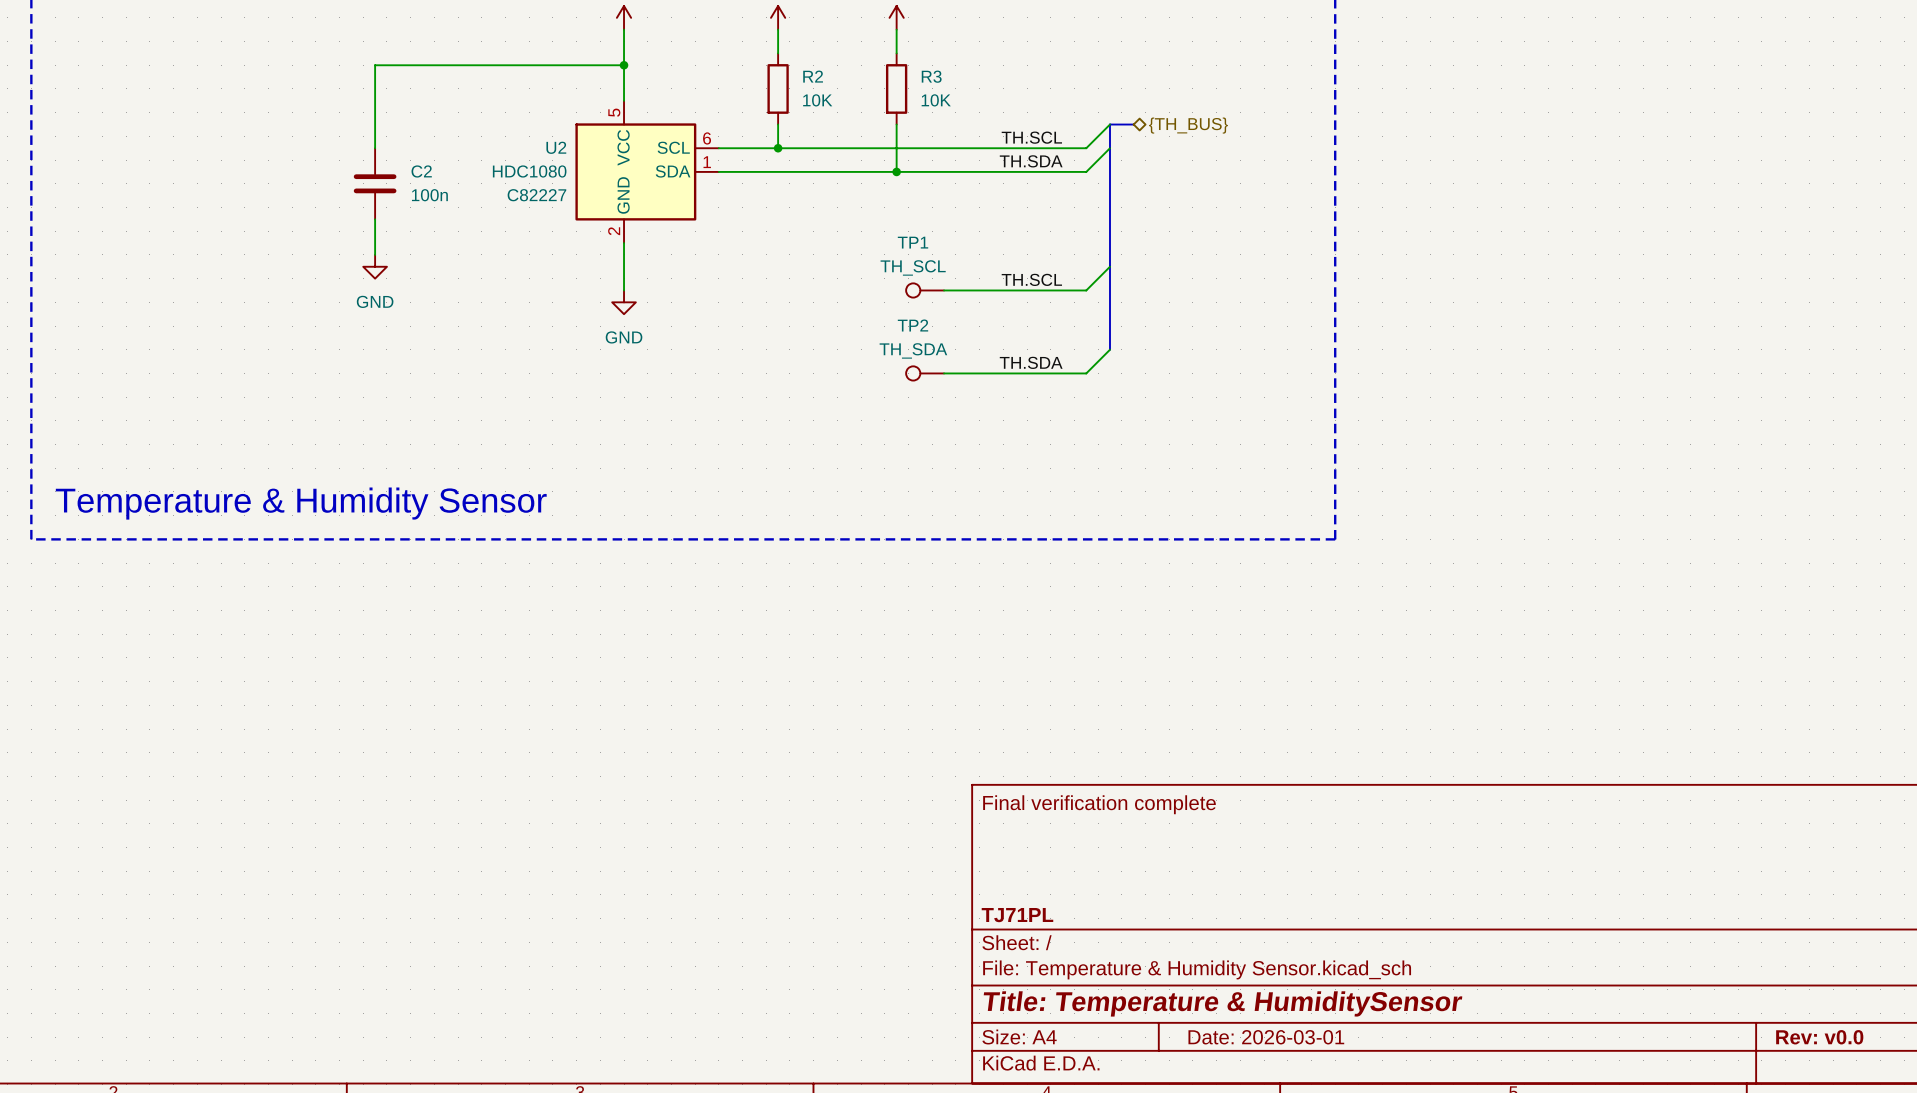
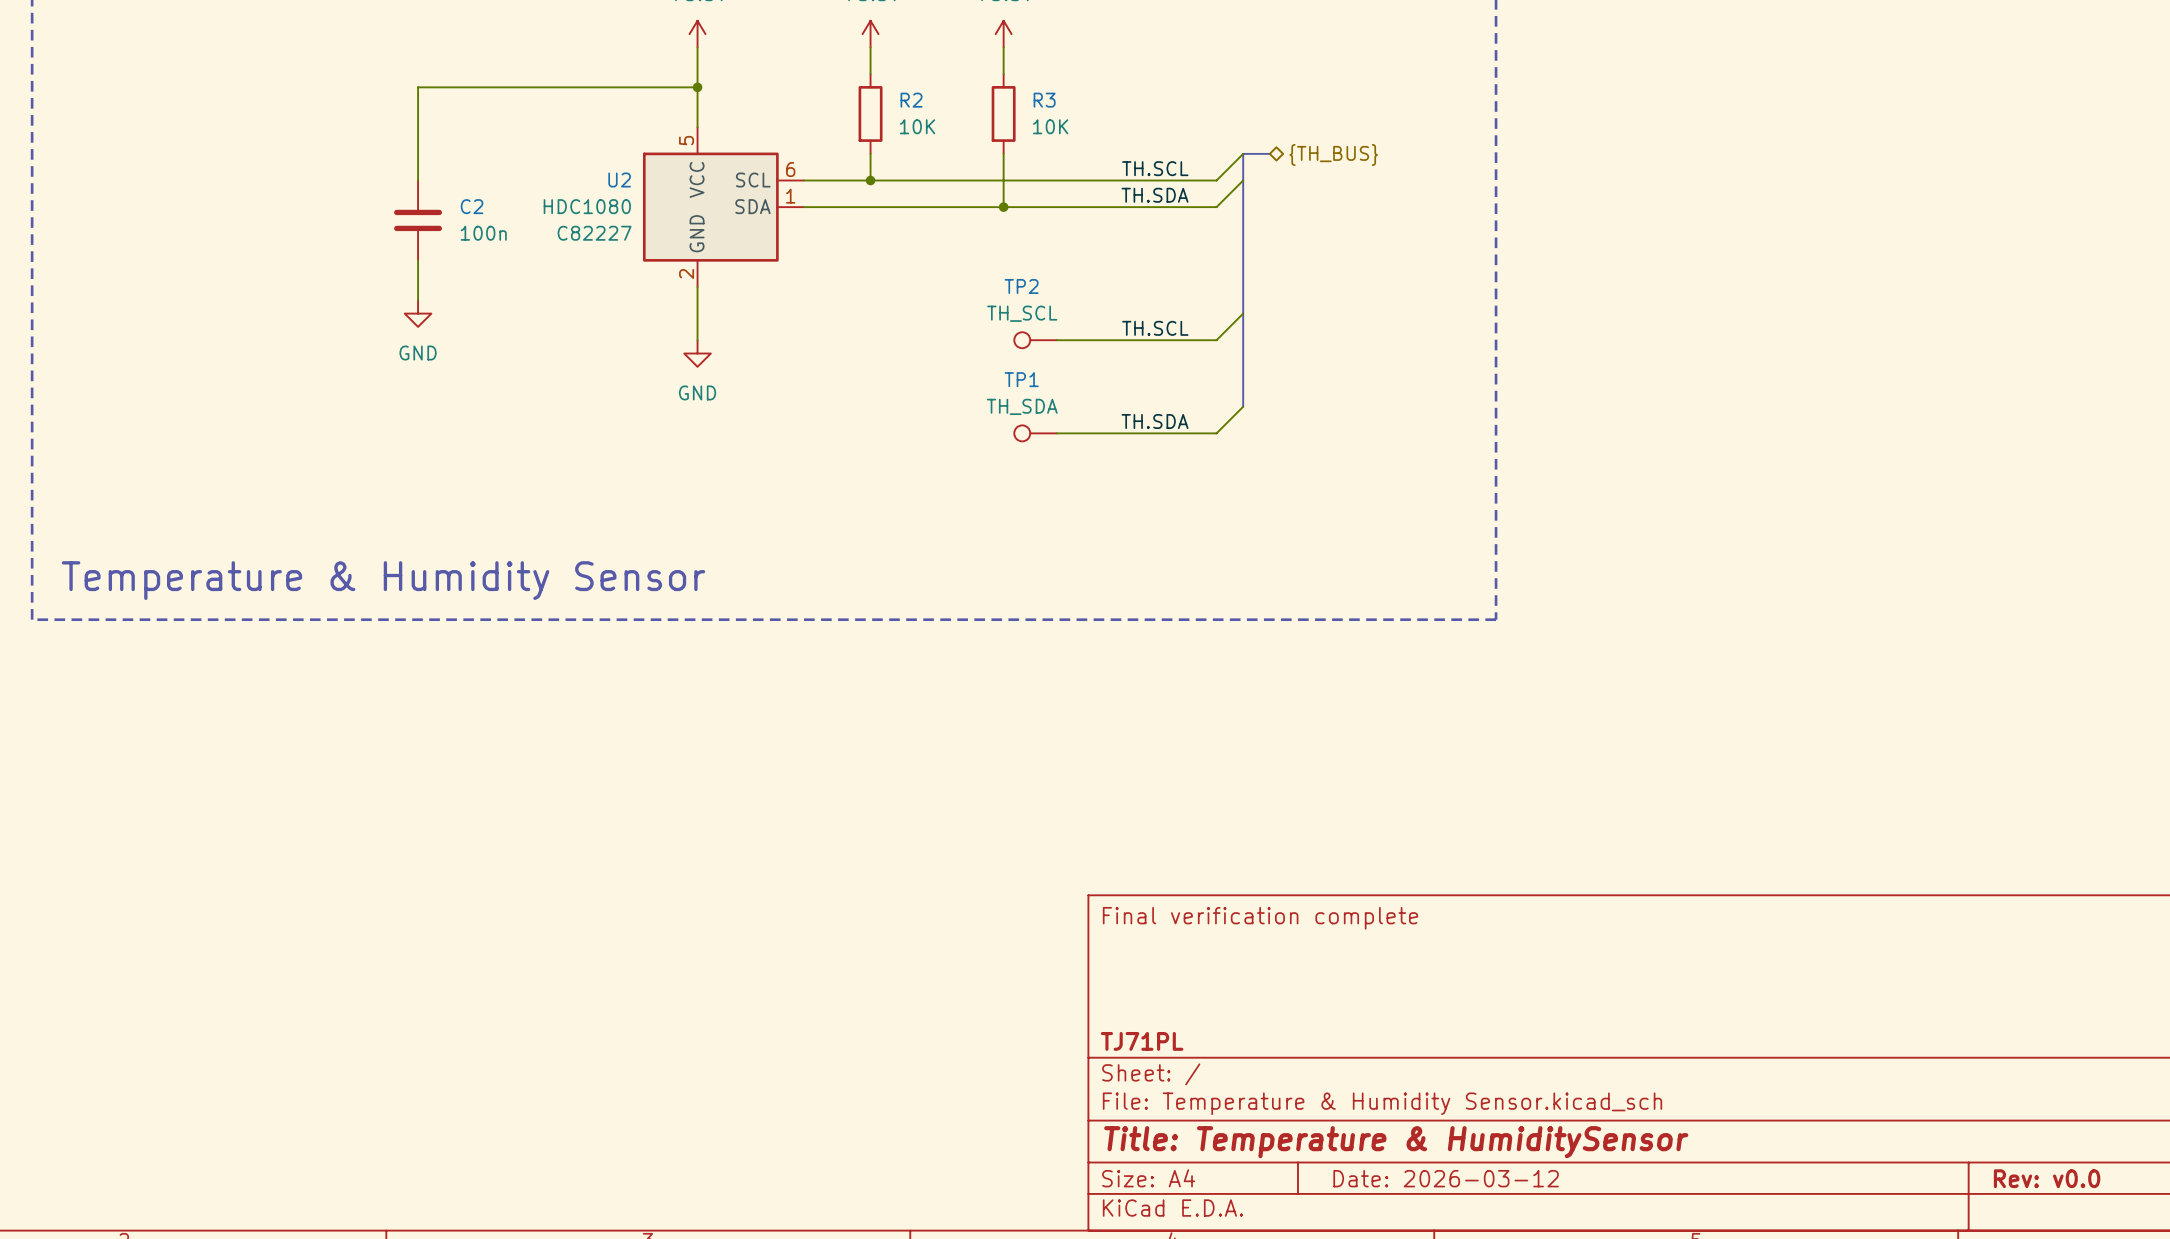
TP1 name: TP1 (913, 242) -> TP2 (1021, 286)
TP2 name: TP2 (912, 325) -> TP1 (1021, 379)
title block: Date: 2026-03-01 (1266, 1037) -> Date: 2026-03-12 (1446, 1178)

